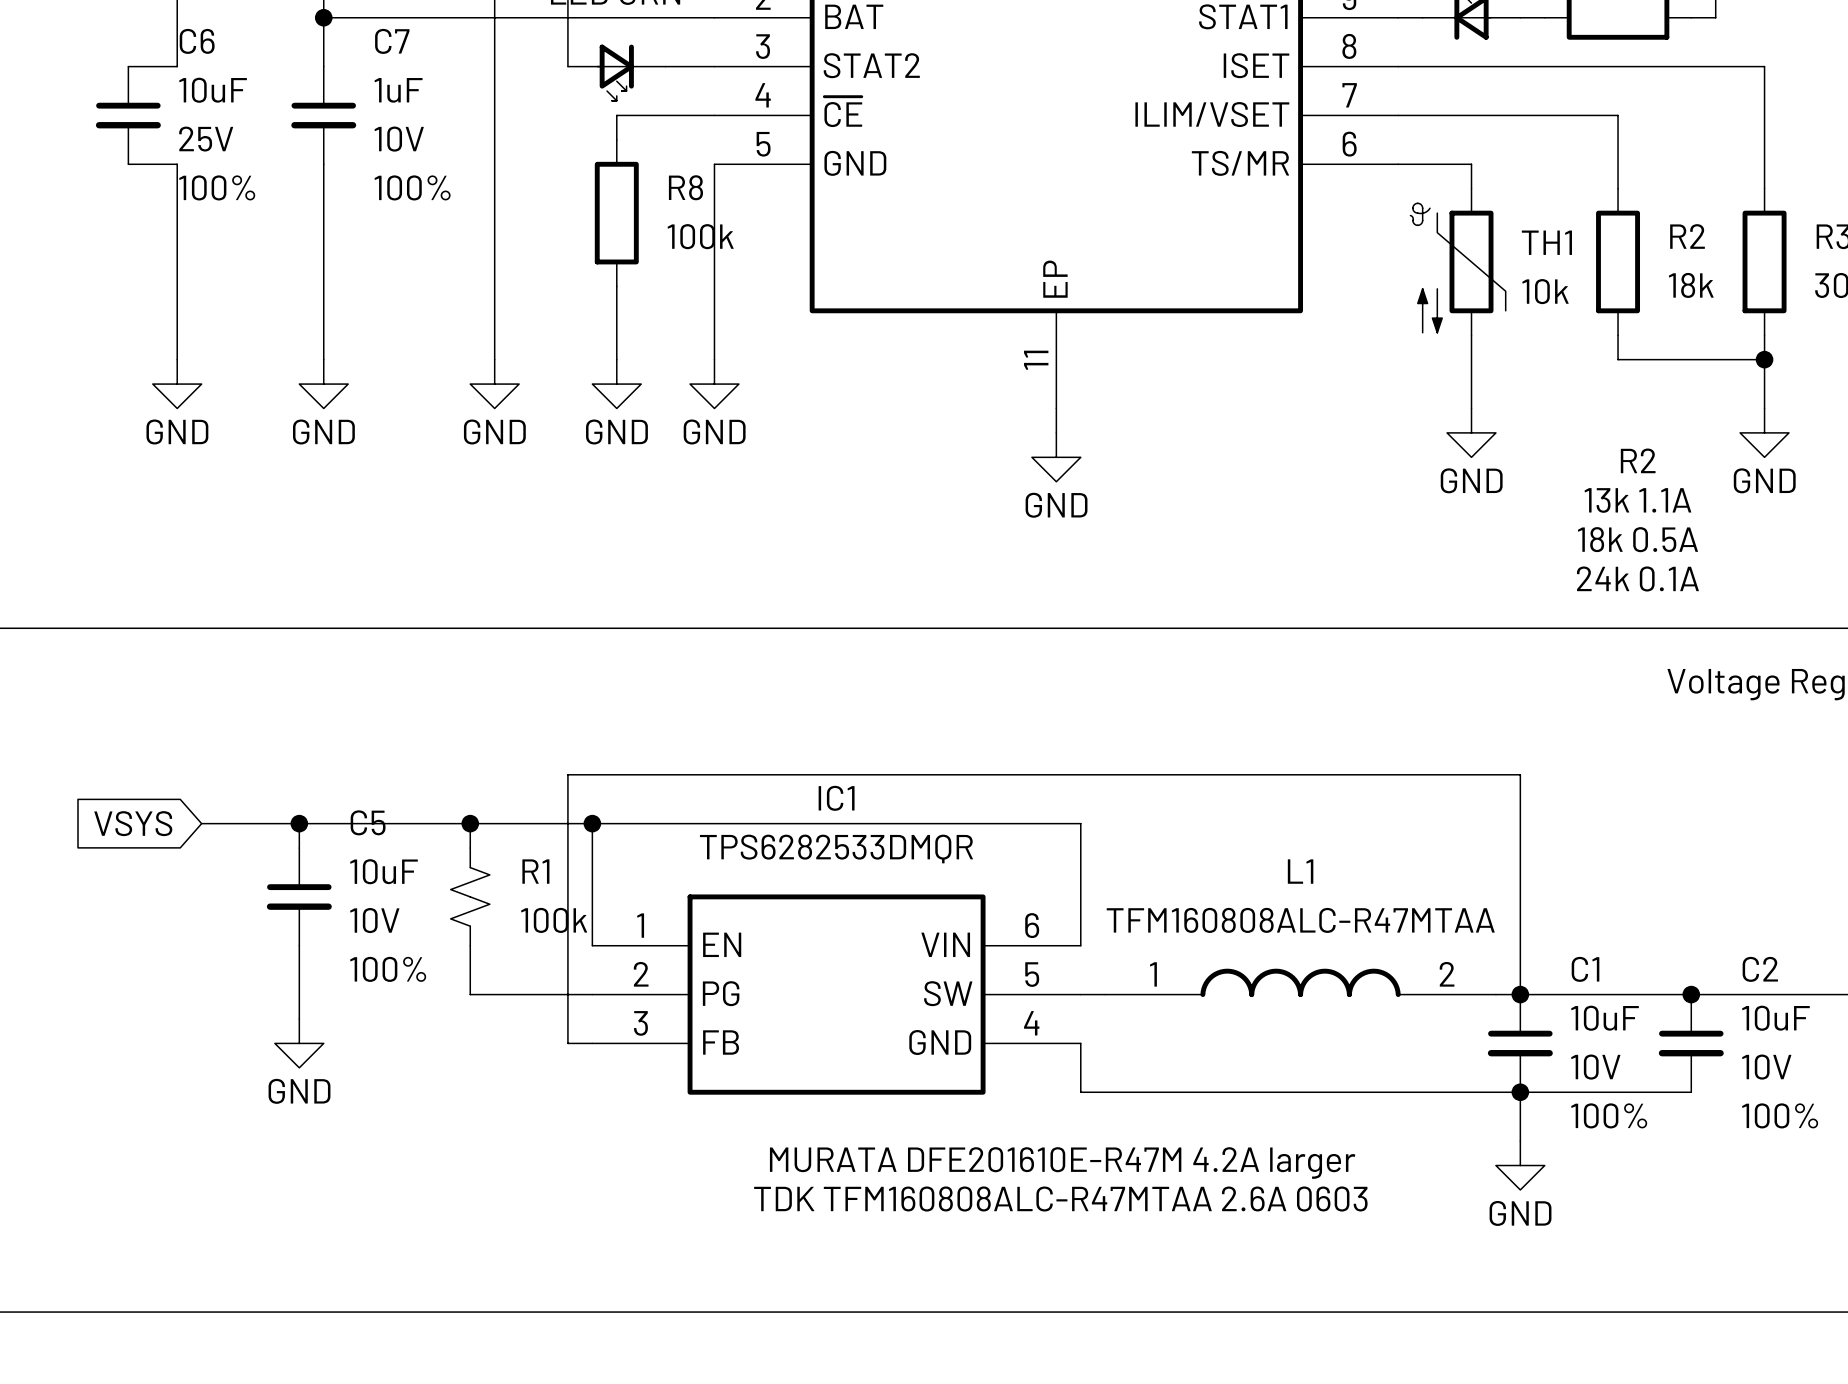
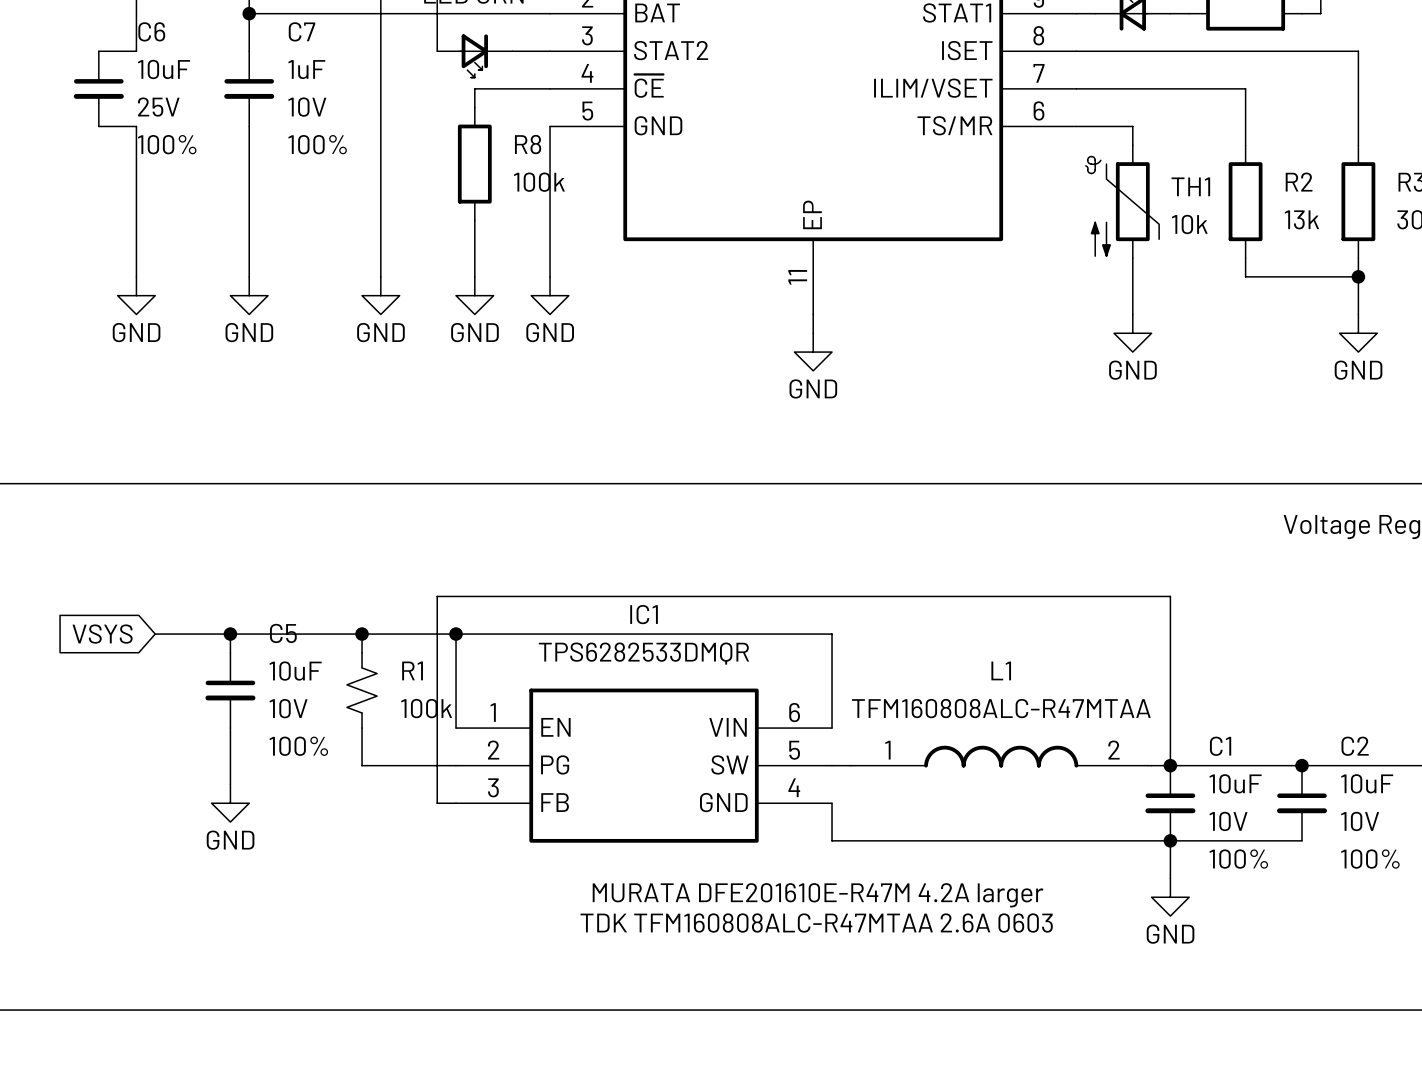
R2 value: 18k (1691, 285) -> 13k (1301, 219)
text: R2 (1638, 460) -> none
text: 13k 1.1A (1637, 500) -> none
text: 18k 0.5A (1637, 539) -> none
text: 24k 0.1A (1637, 578) -> none

